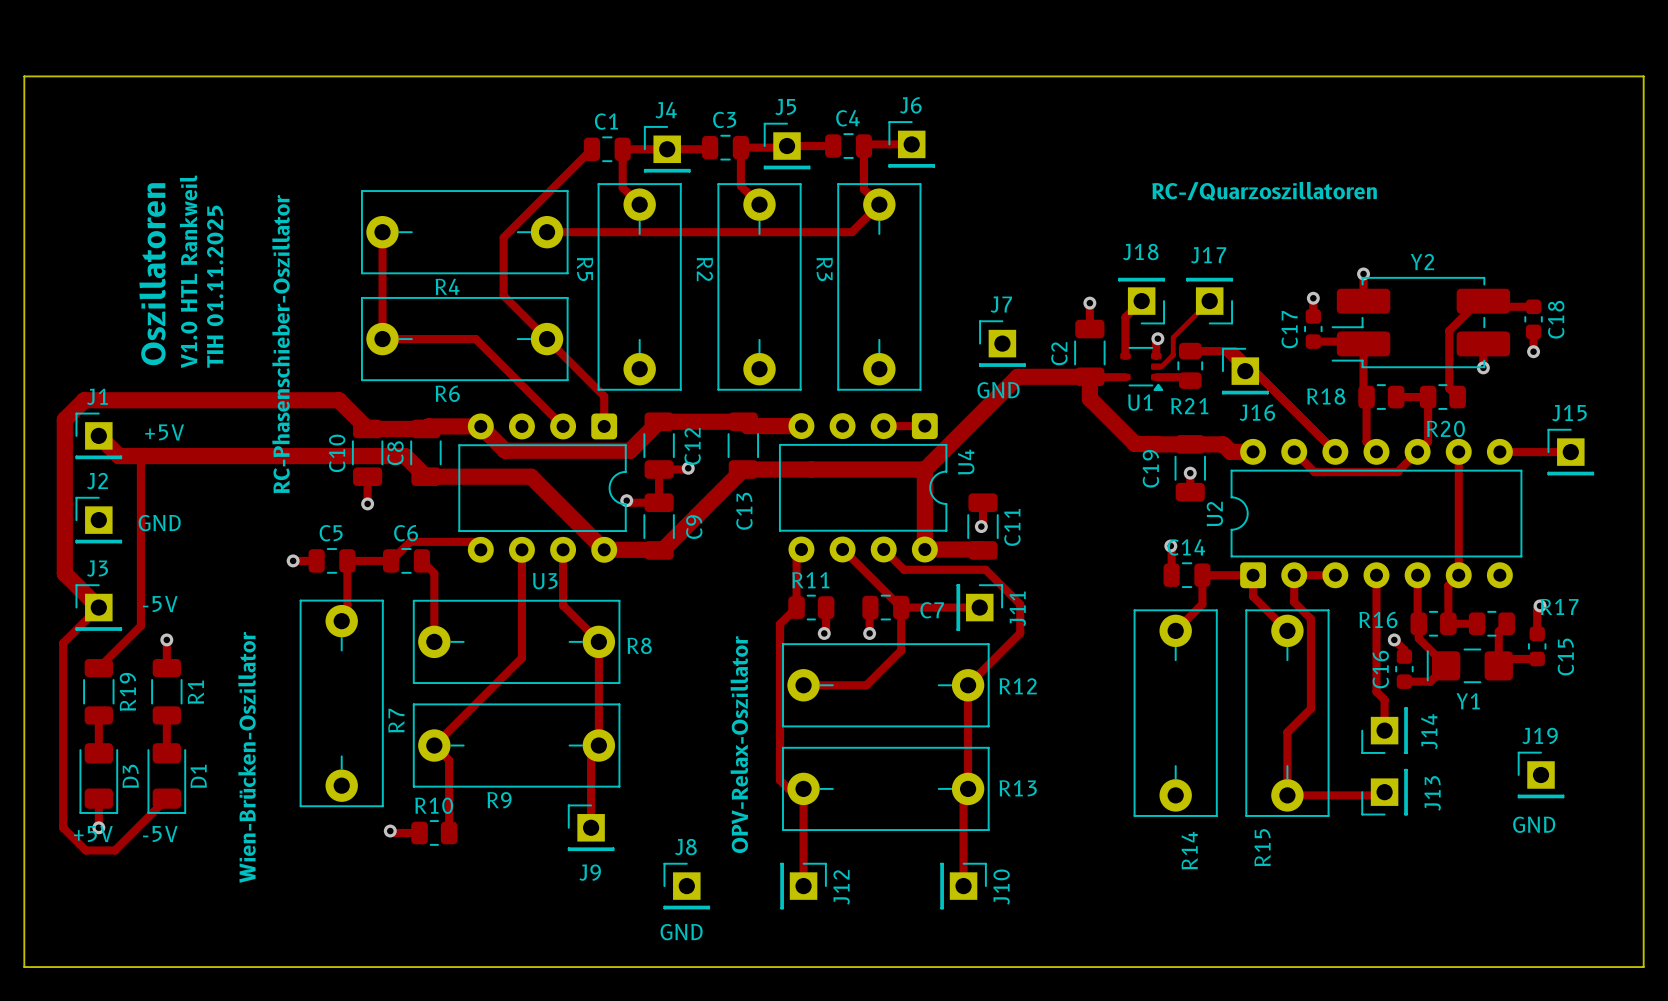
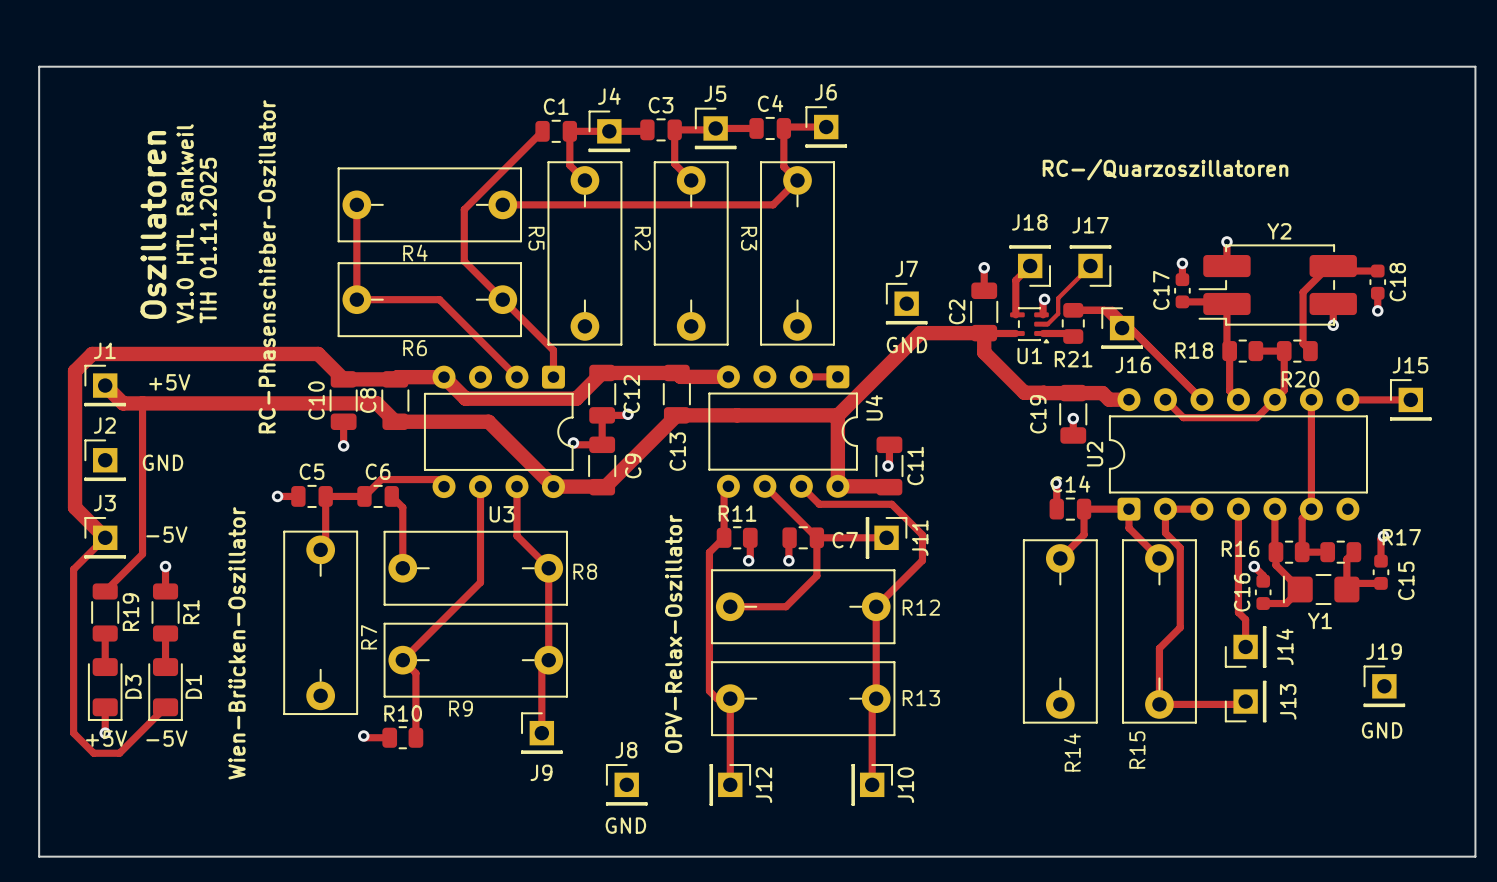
U1 footprint: [1120, 346, 1164, 391] -> [1010, 307, 1050, 344]

